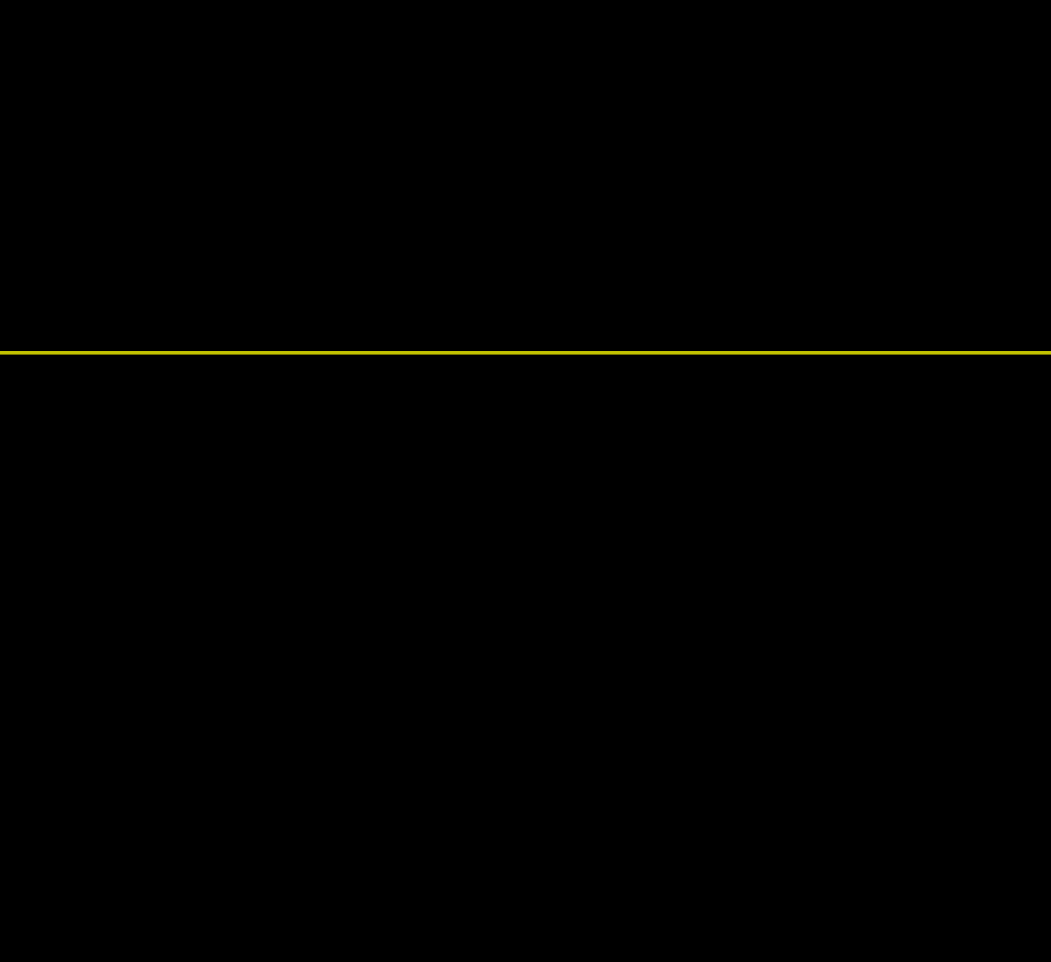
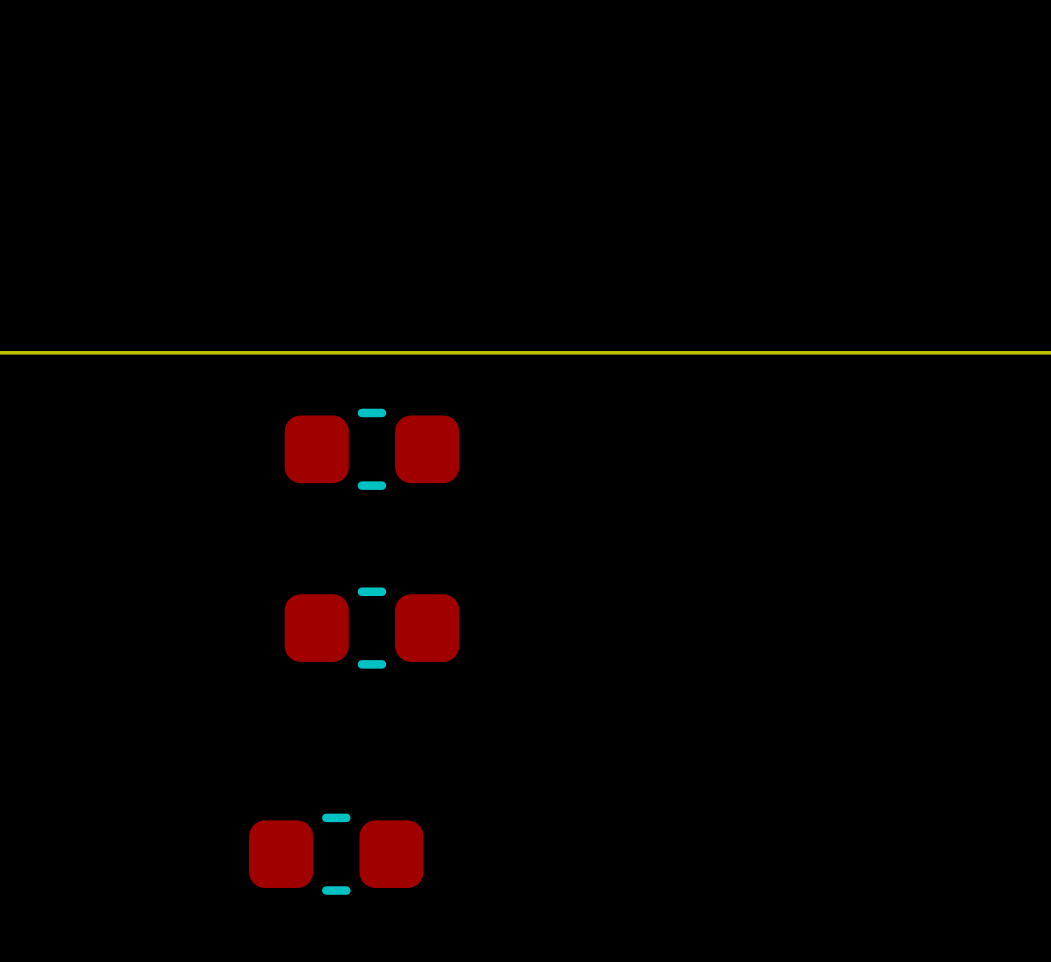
part: none -> (371, 449)
part: none -> (371, 628)
part: none -> (336, 854)

